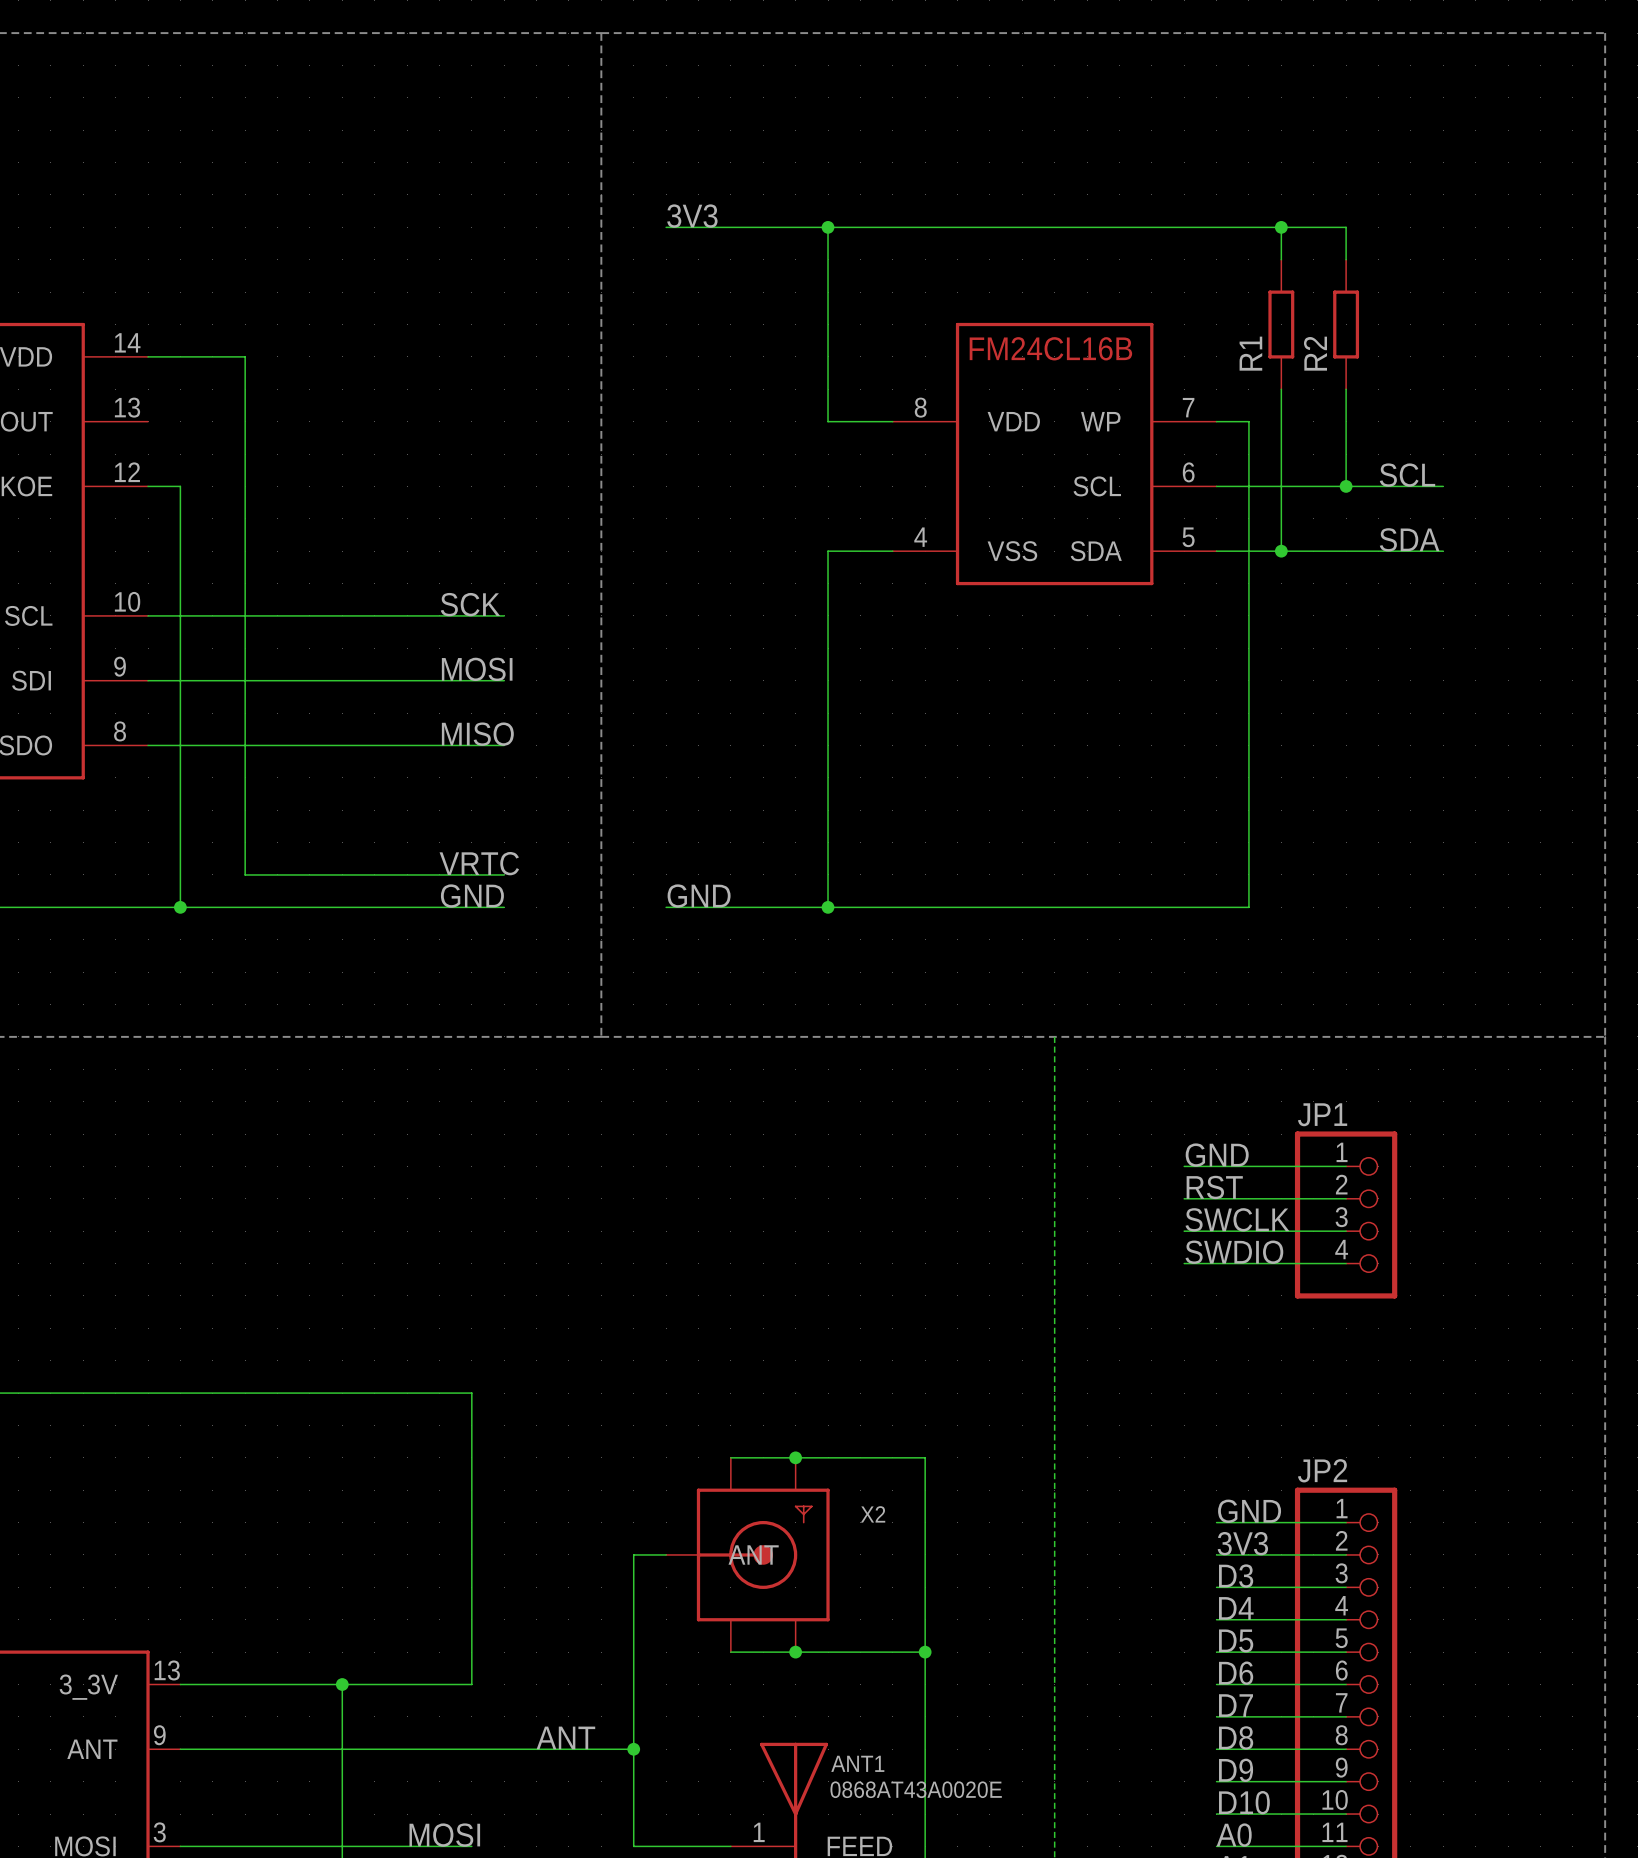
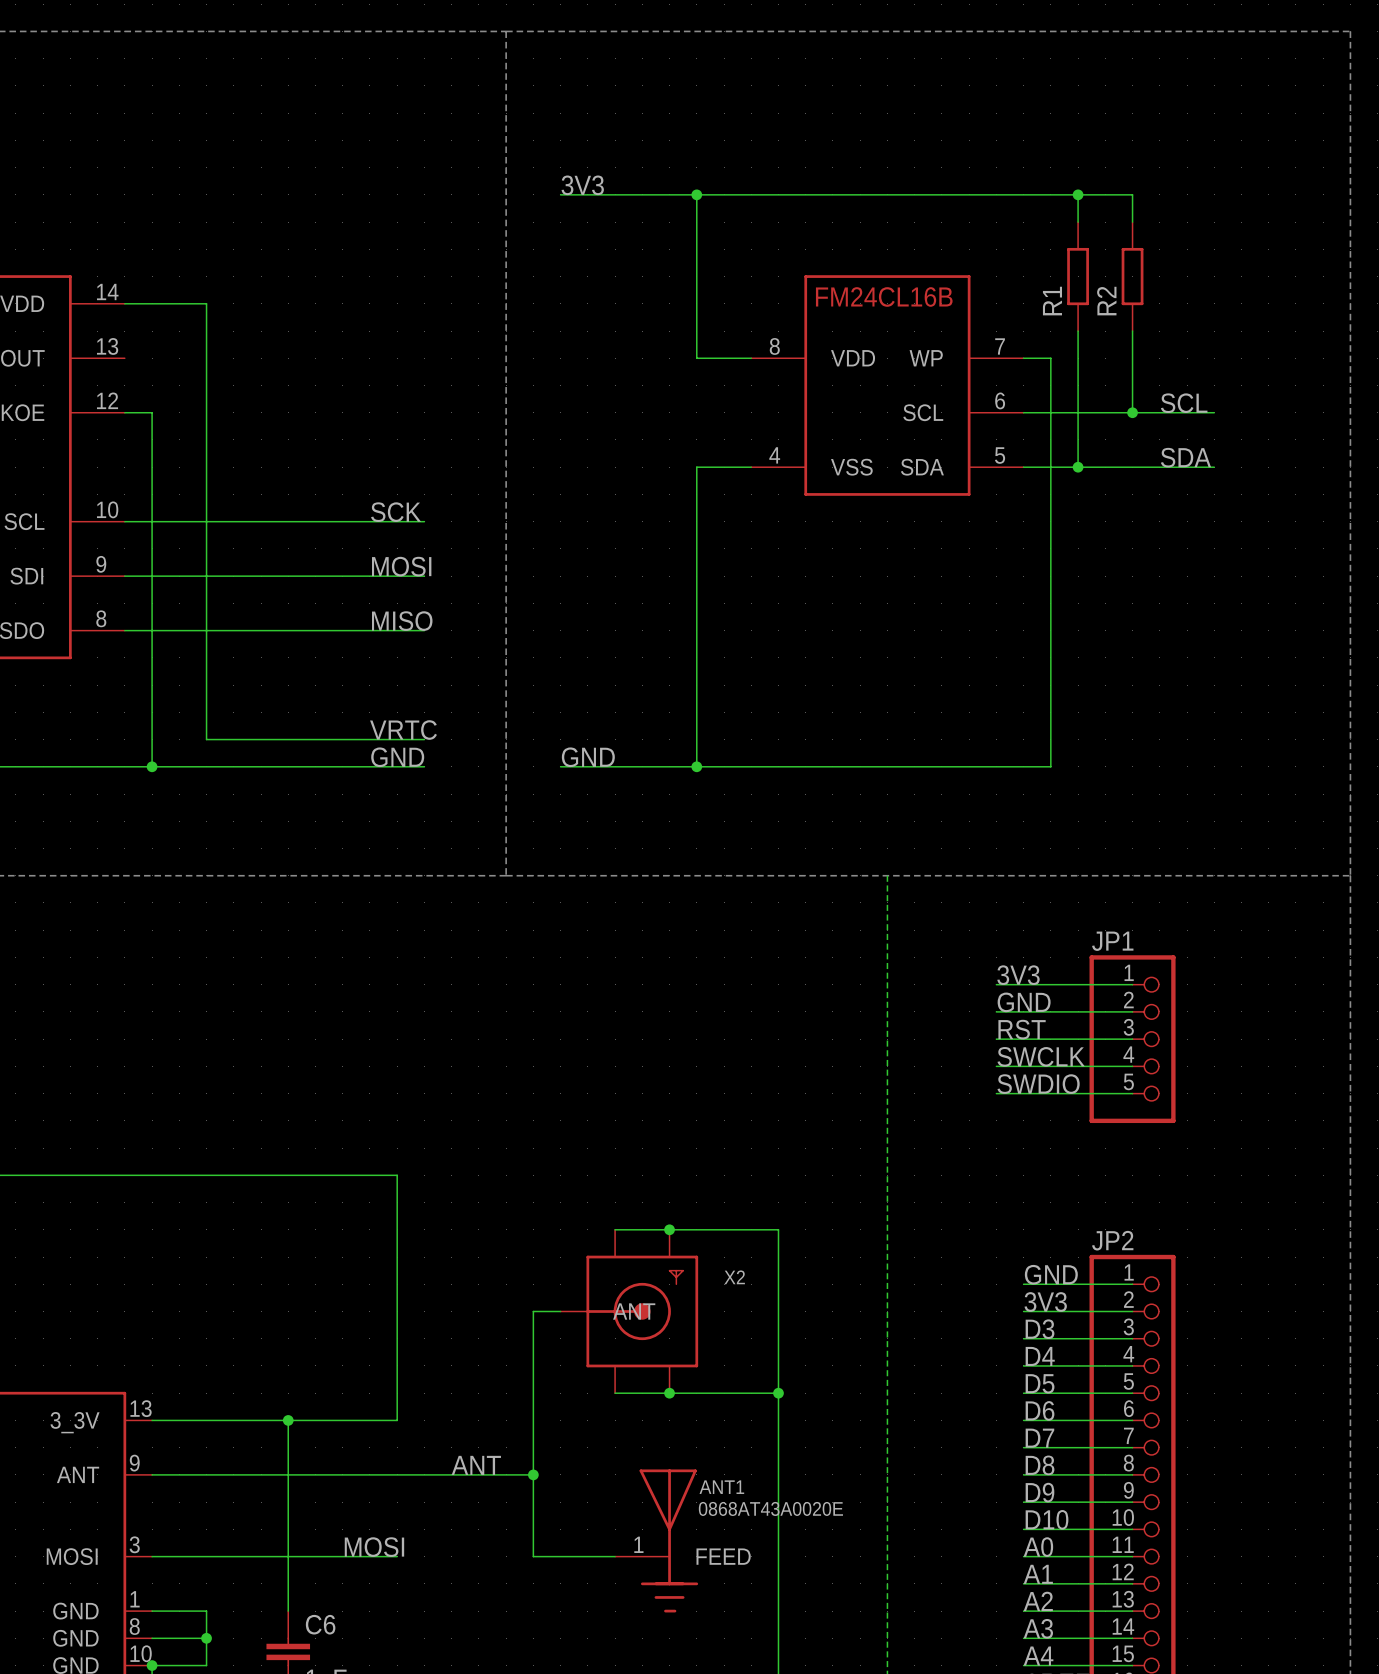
JP1 symbol: [1294, 1131, 1398, 1299] -> [1089, 955, 1176, 1124]
label: GND (1217, 1155) -> 3V3 (1018, 975)
label: RST (1214, 1187) -> GND (1024, 1002)
label: SWCLK (1237, 1219) -> RST (1022, 1029)
label: SWDIO (1234, 1252) -> SWCLK (1041, 1056)
label: none -> SWDIO (1038, 1084)
wire: none -> (996, 1093) (1132, 1093)

